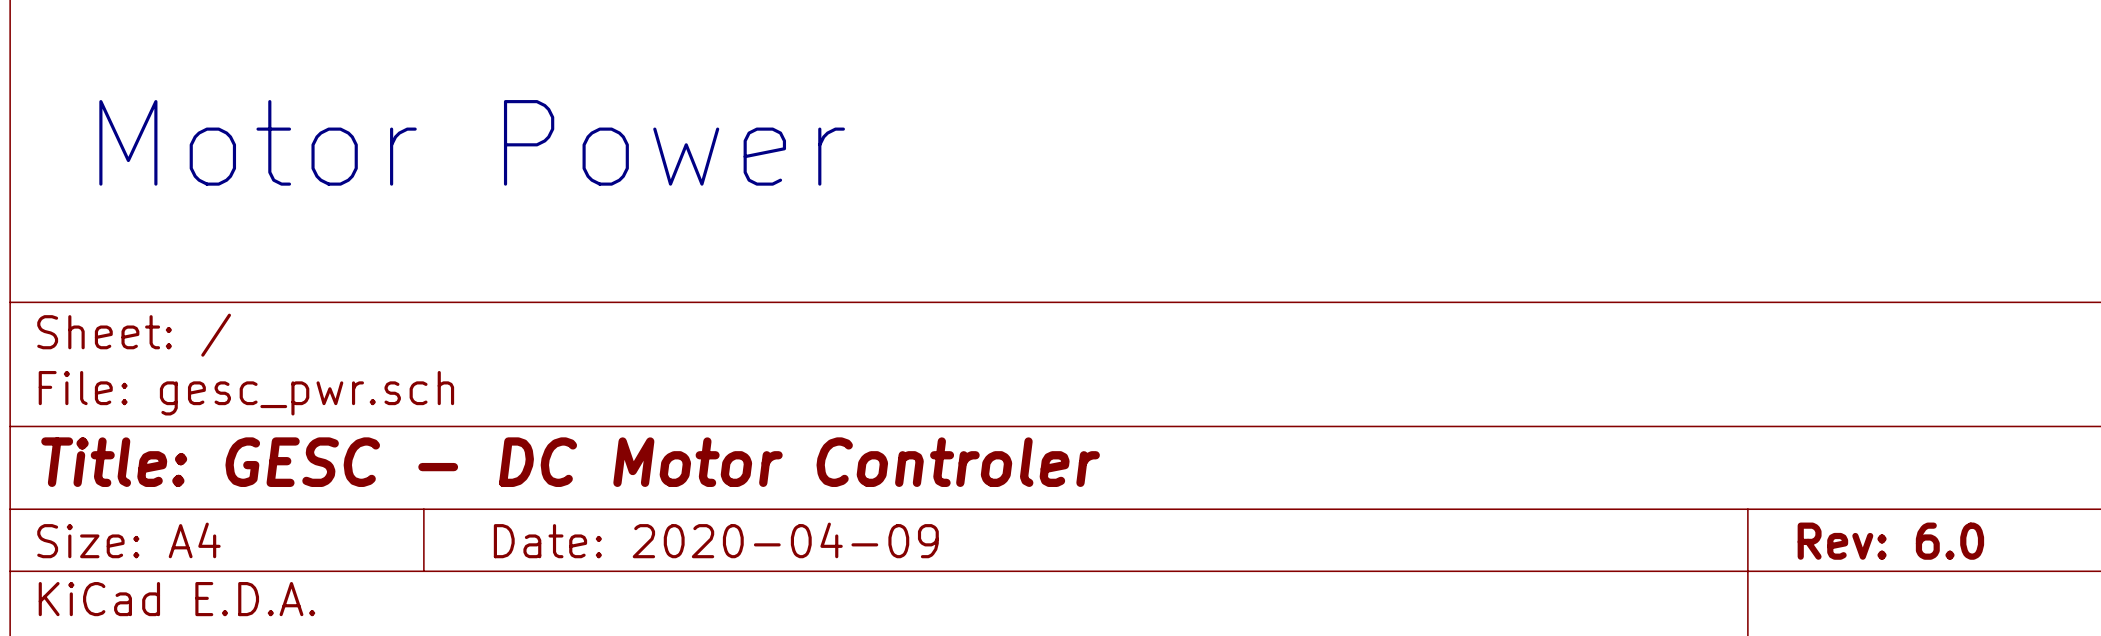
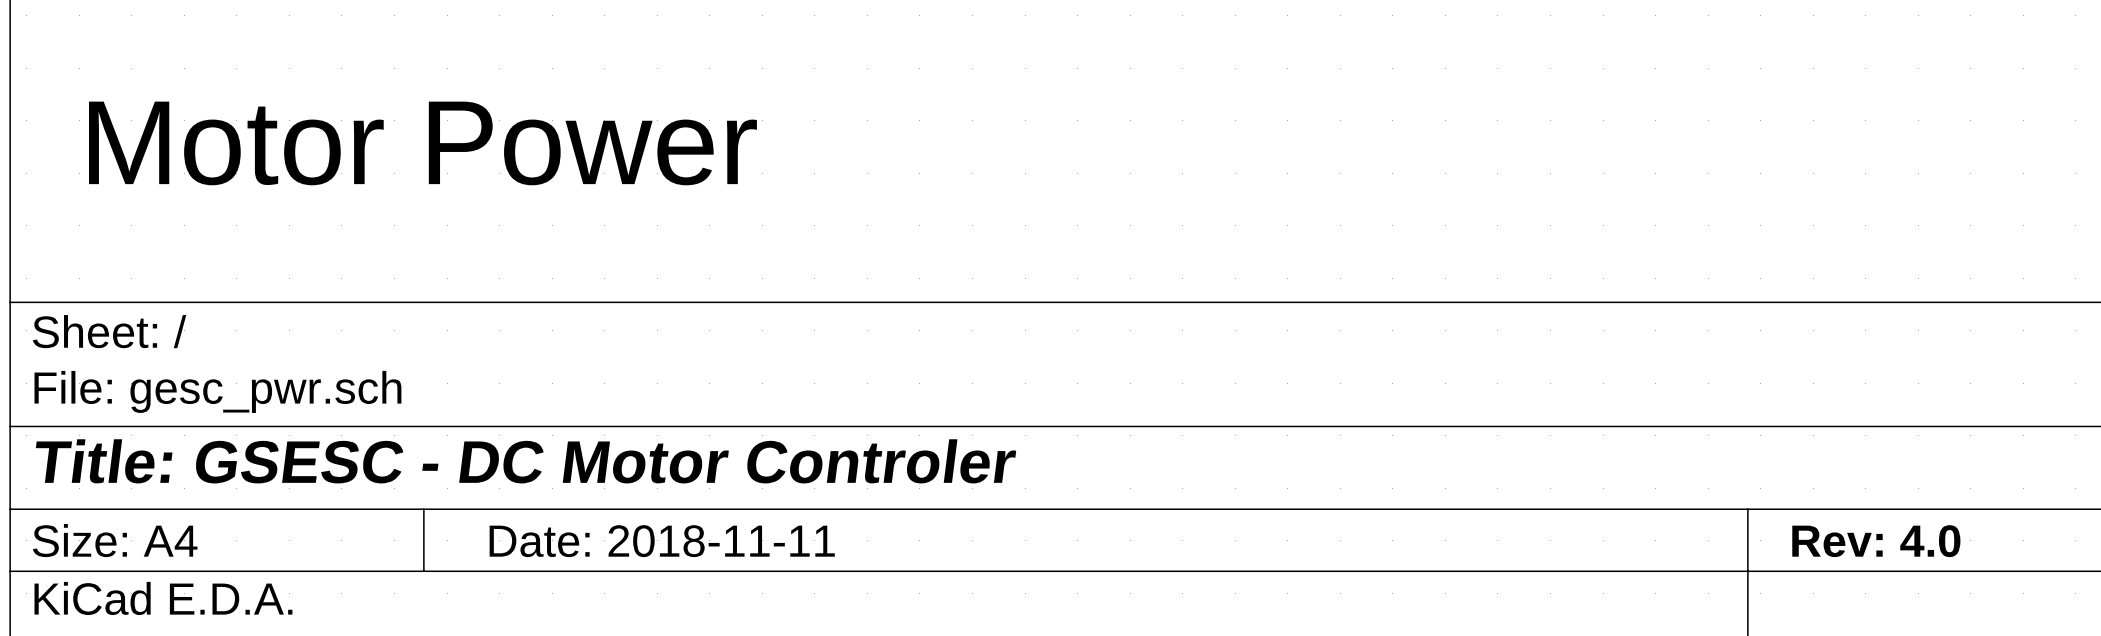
title block: Title: GESC - DC Motor Controler (570, 462) -> Title: GSESC - DC Motor Controler (526, 461)
title block: Date: 2020-04-09 (716, 540) -> Date: 2018-11-11 (662, 541)
title block: Rev: 6.0 (1890, 541) -> Rev: 4.0 (1876, 541)

